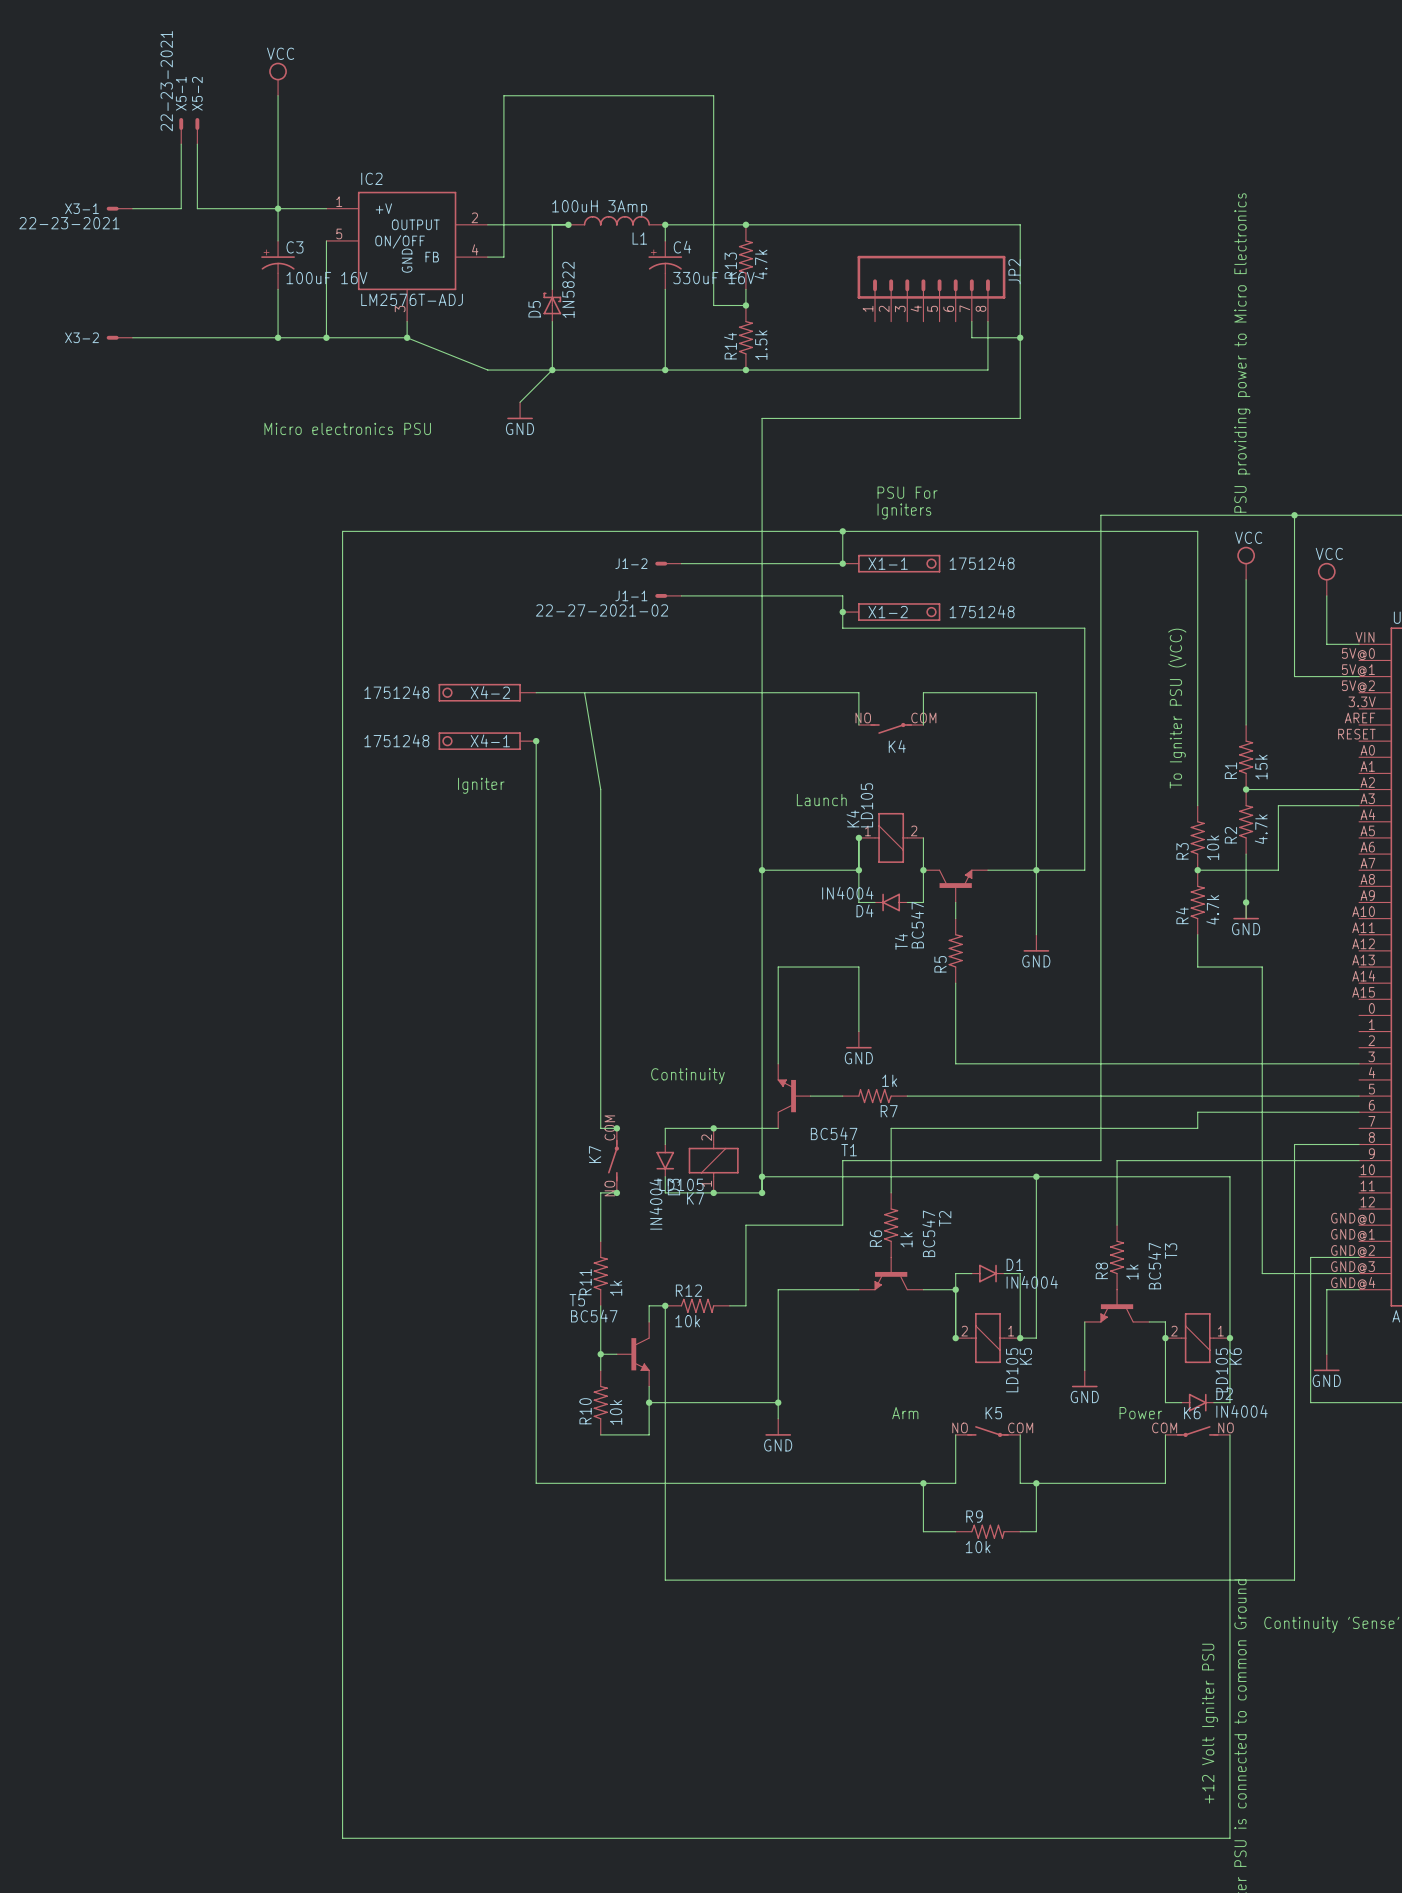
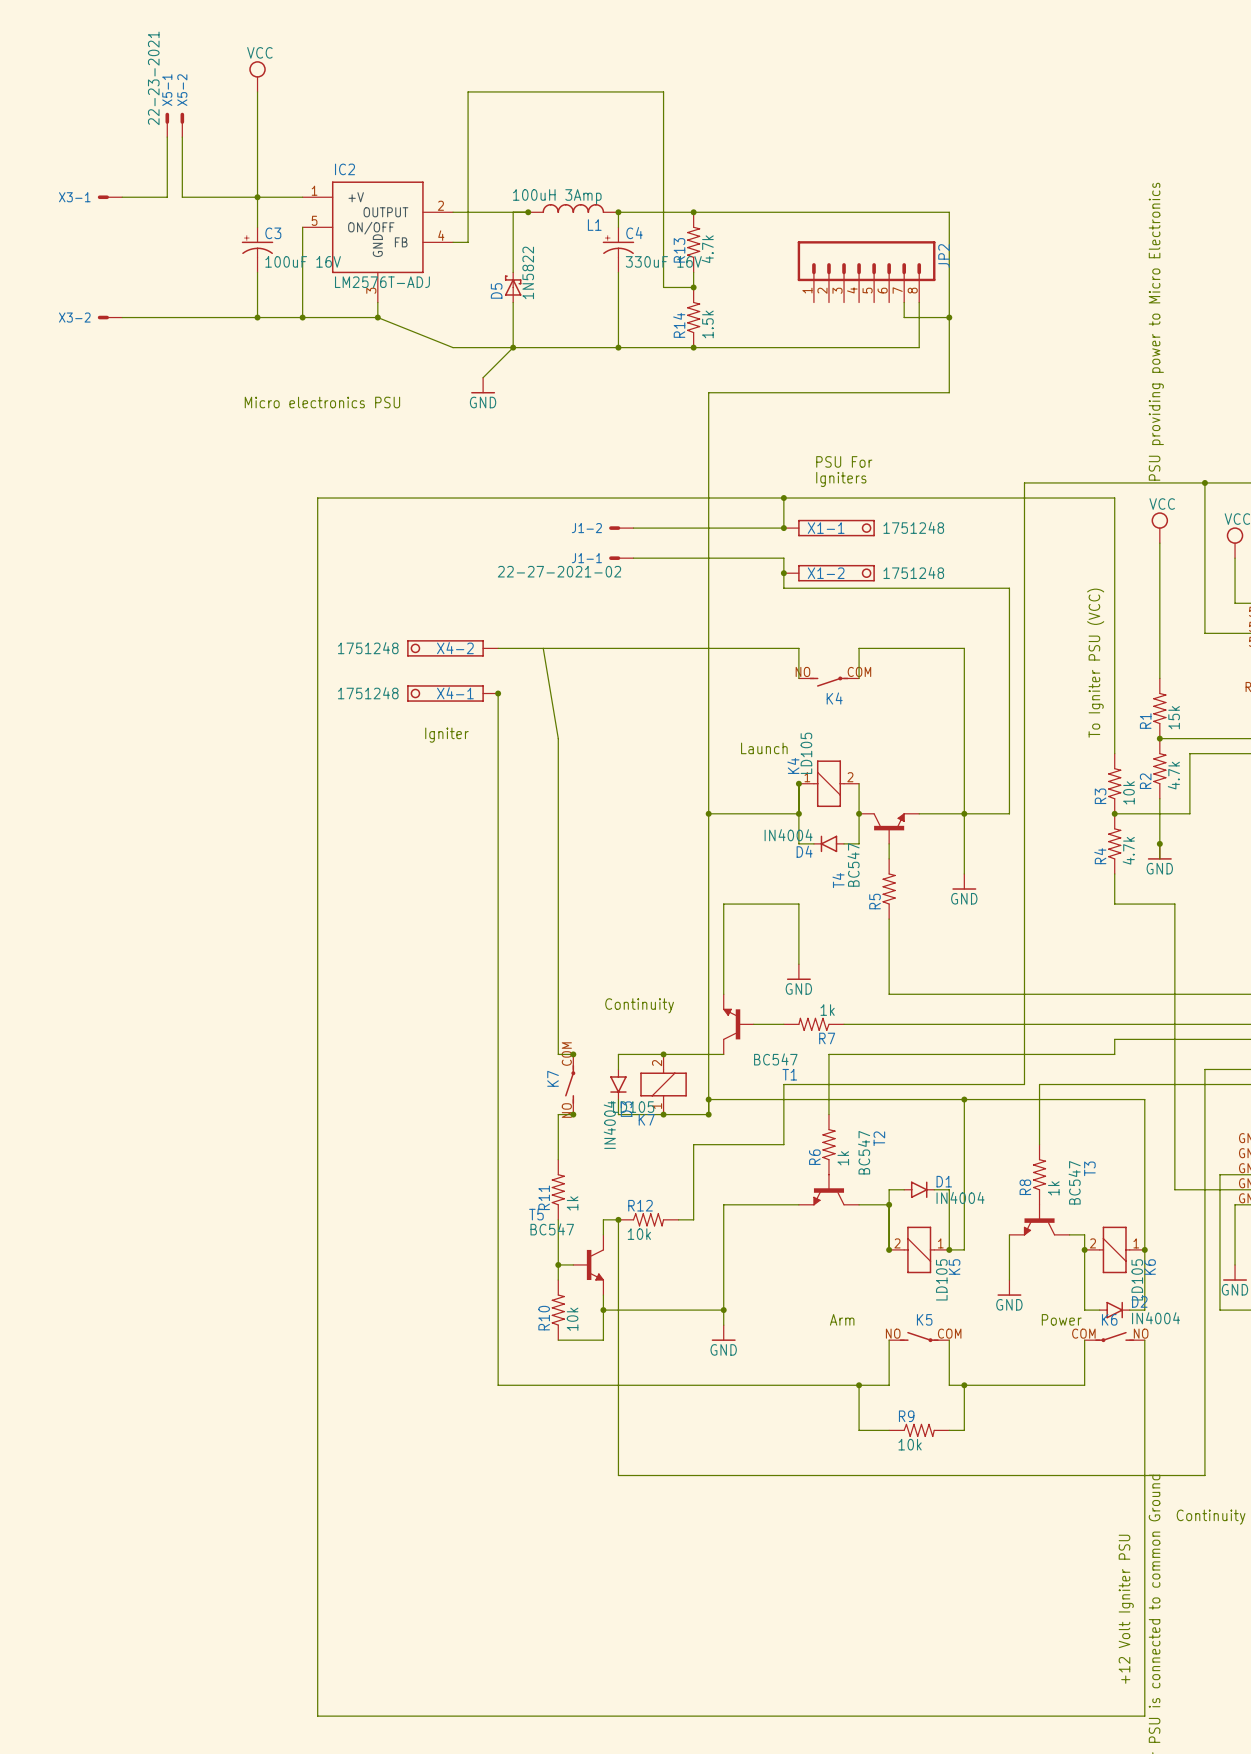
X3-1 value: 22-23-2021 (69, 223) -> none

